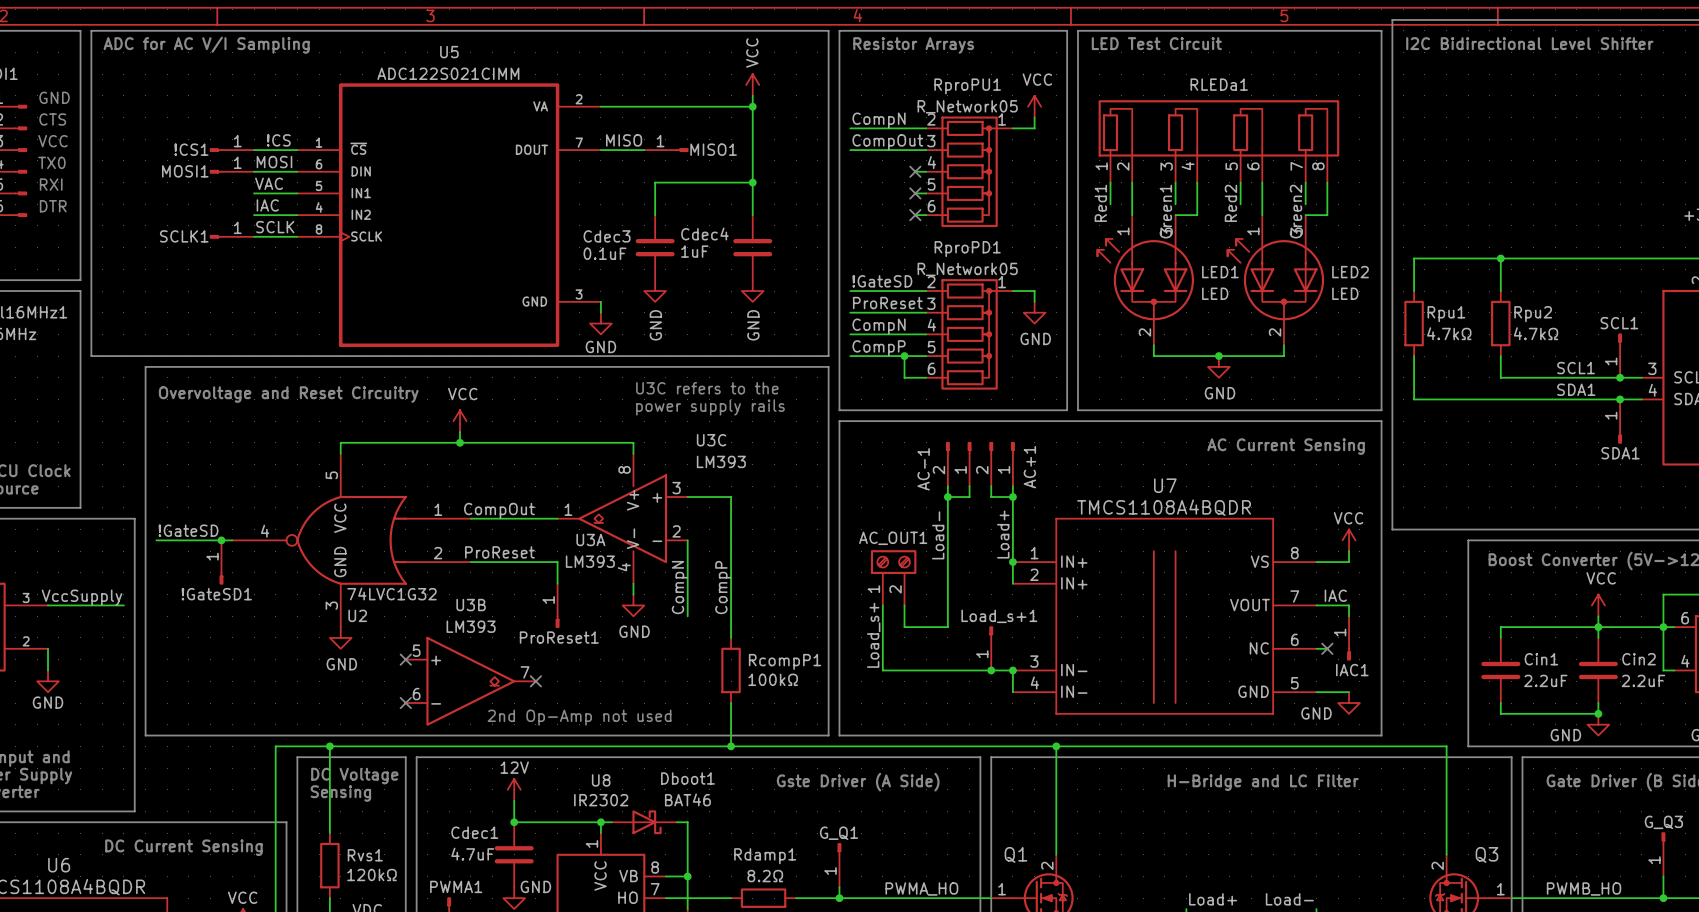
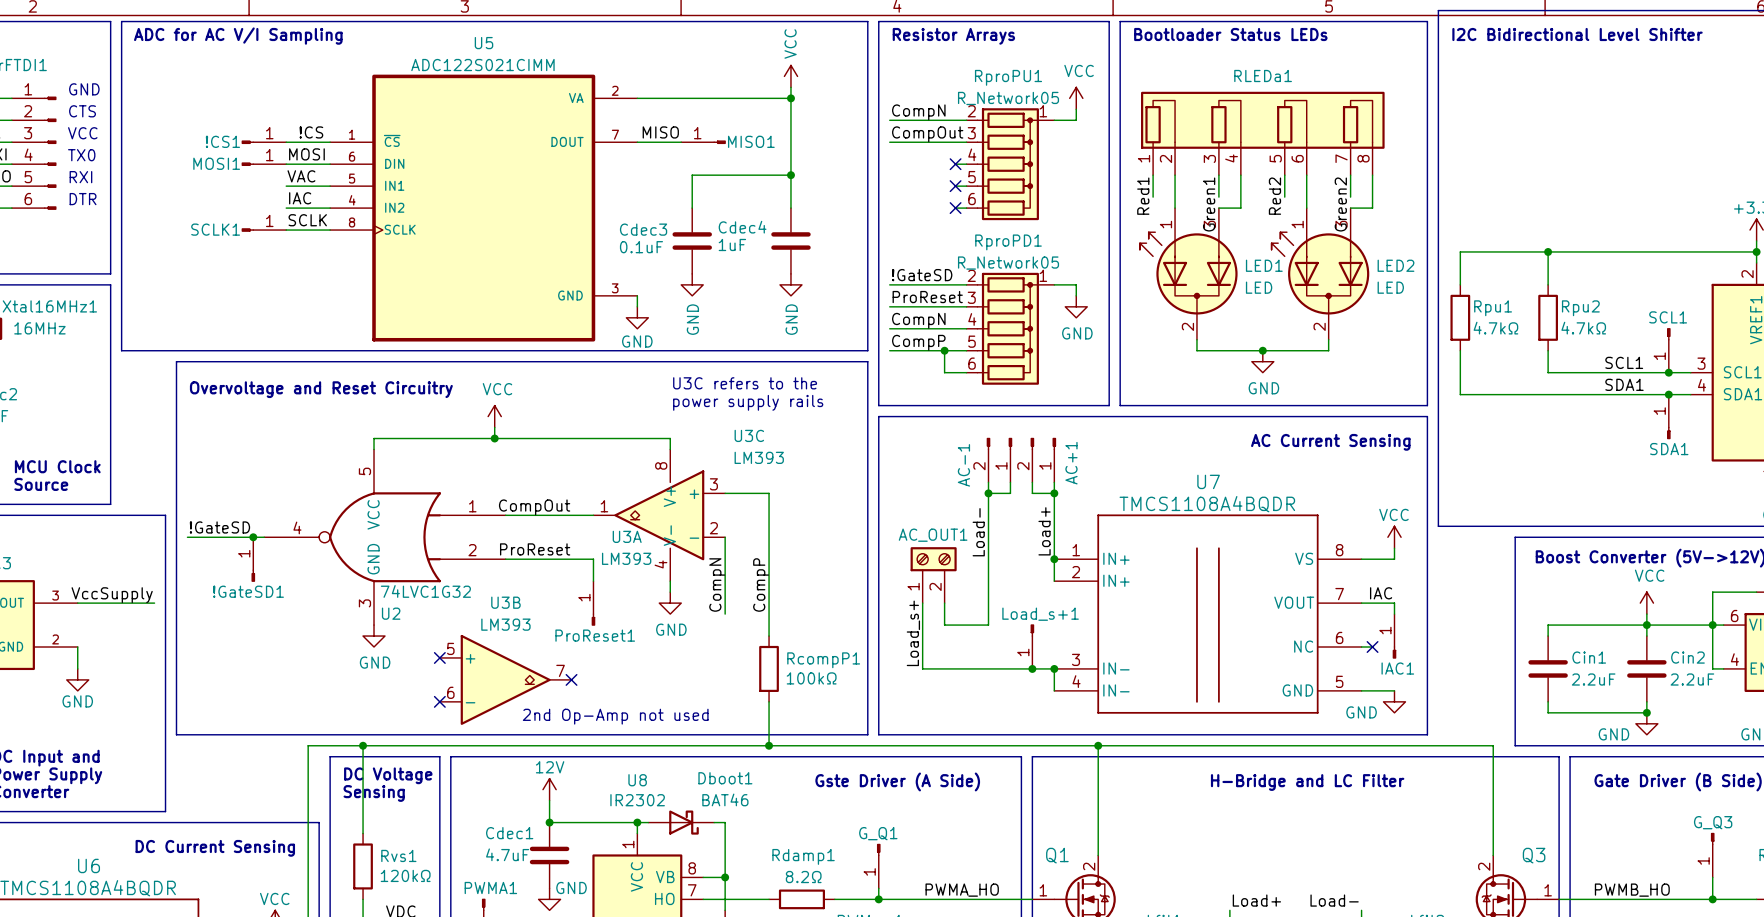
text: LED Test Circuit (1156, 43) -> Bootloader Status LEDs (1230, 34)

